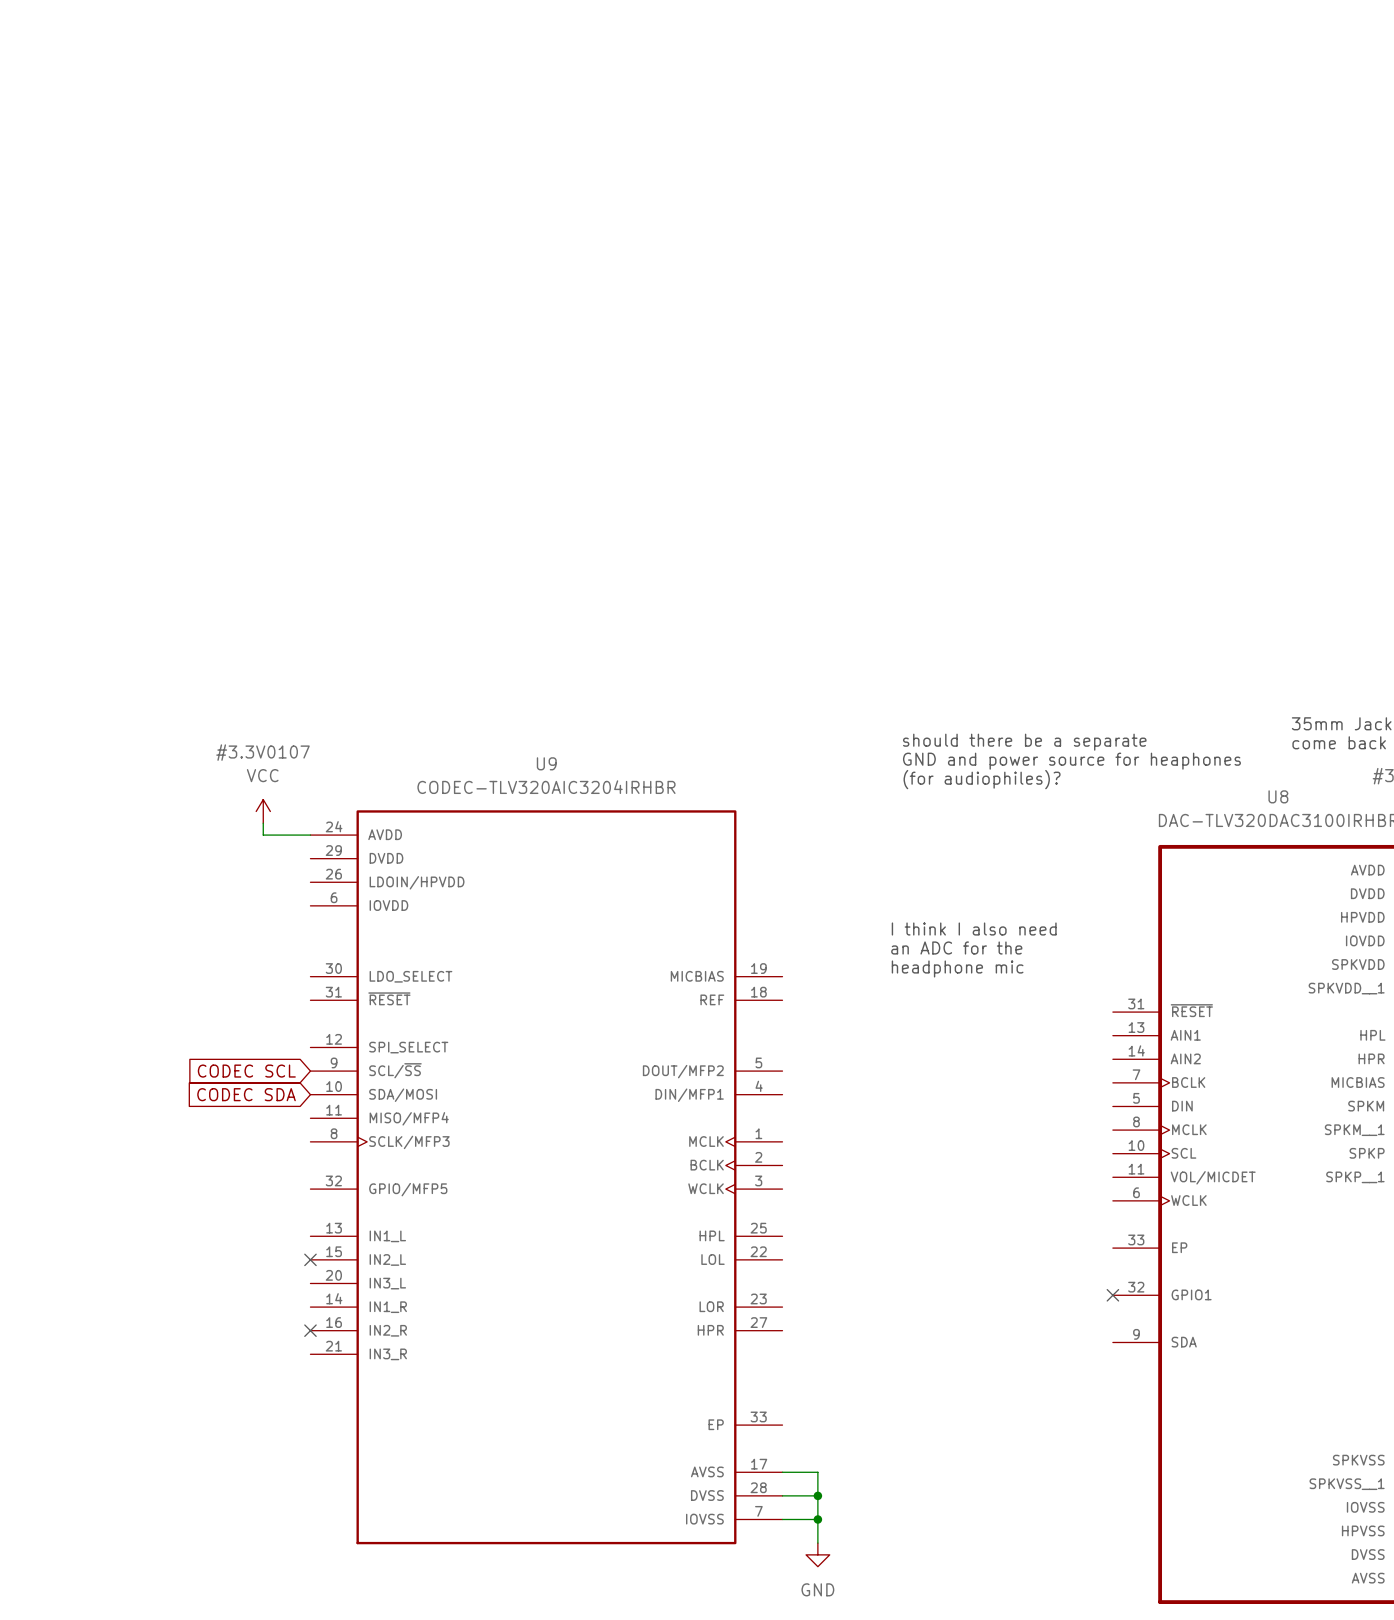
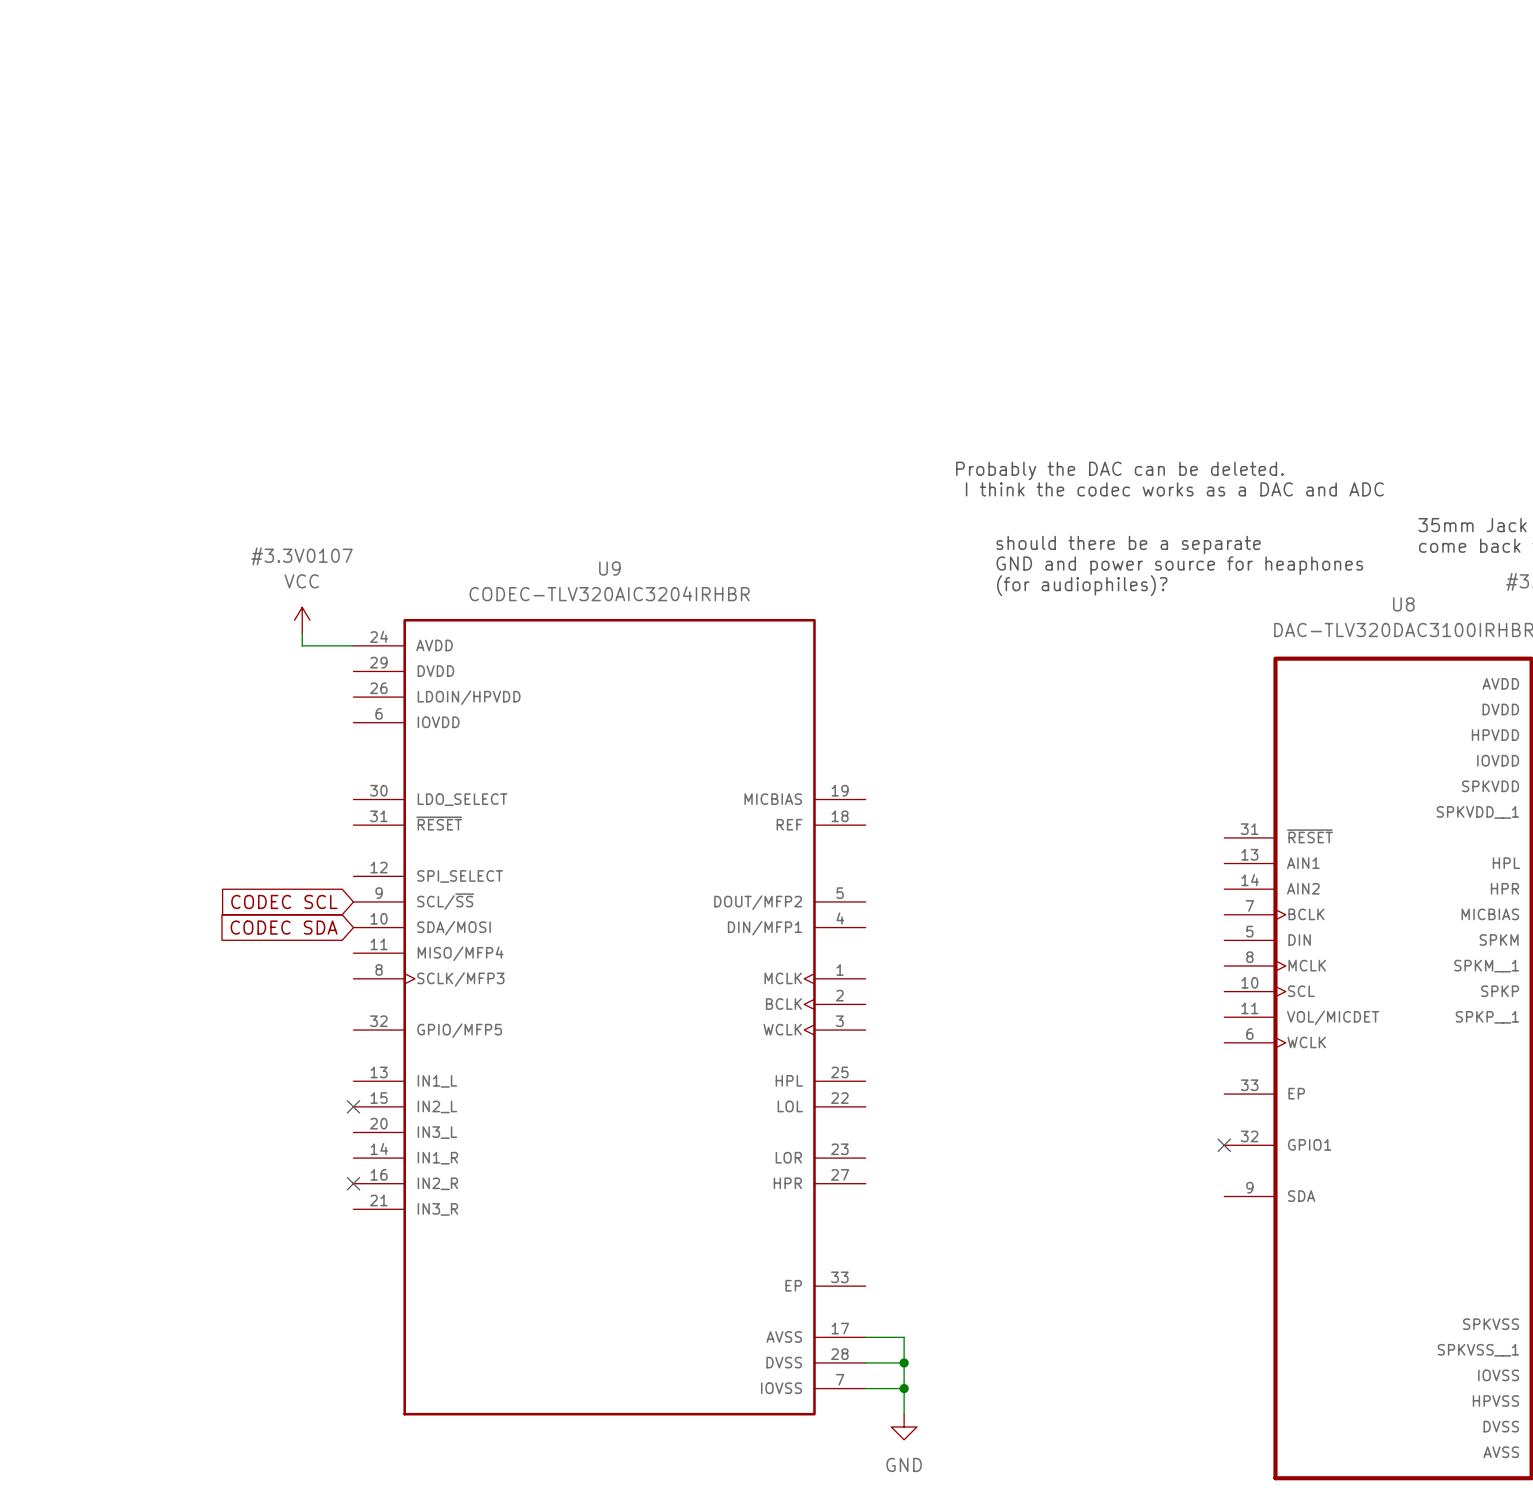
text: none -> Probably the DAC can be deleted. (1119, 470)
text: none -> I think the codec works as a DAC and ADC (1174, 489)
text: I think I also need (974, 929) -> none
text: an ADC for the (956, 948) -> none
text: headphone mic (957, 968) -> none

